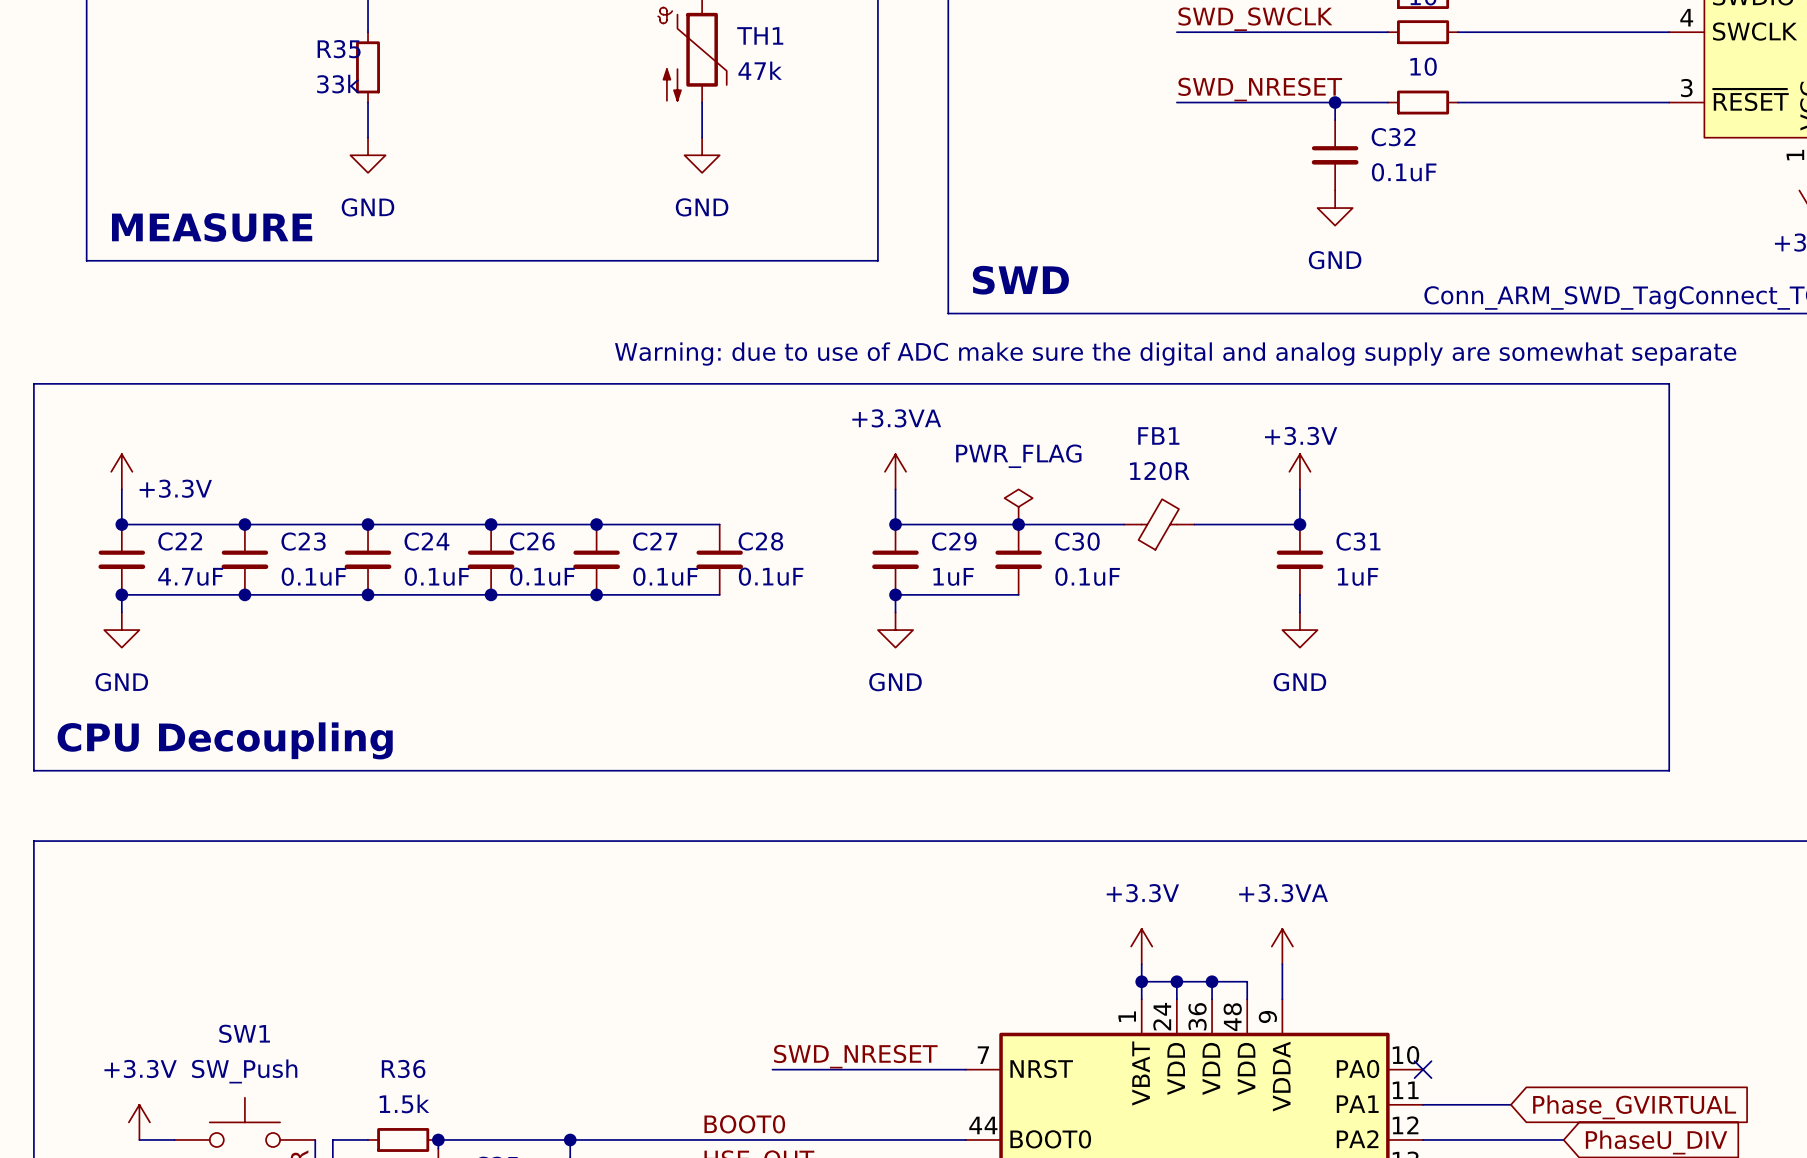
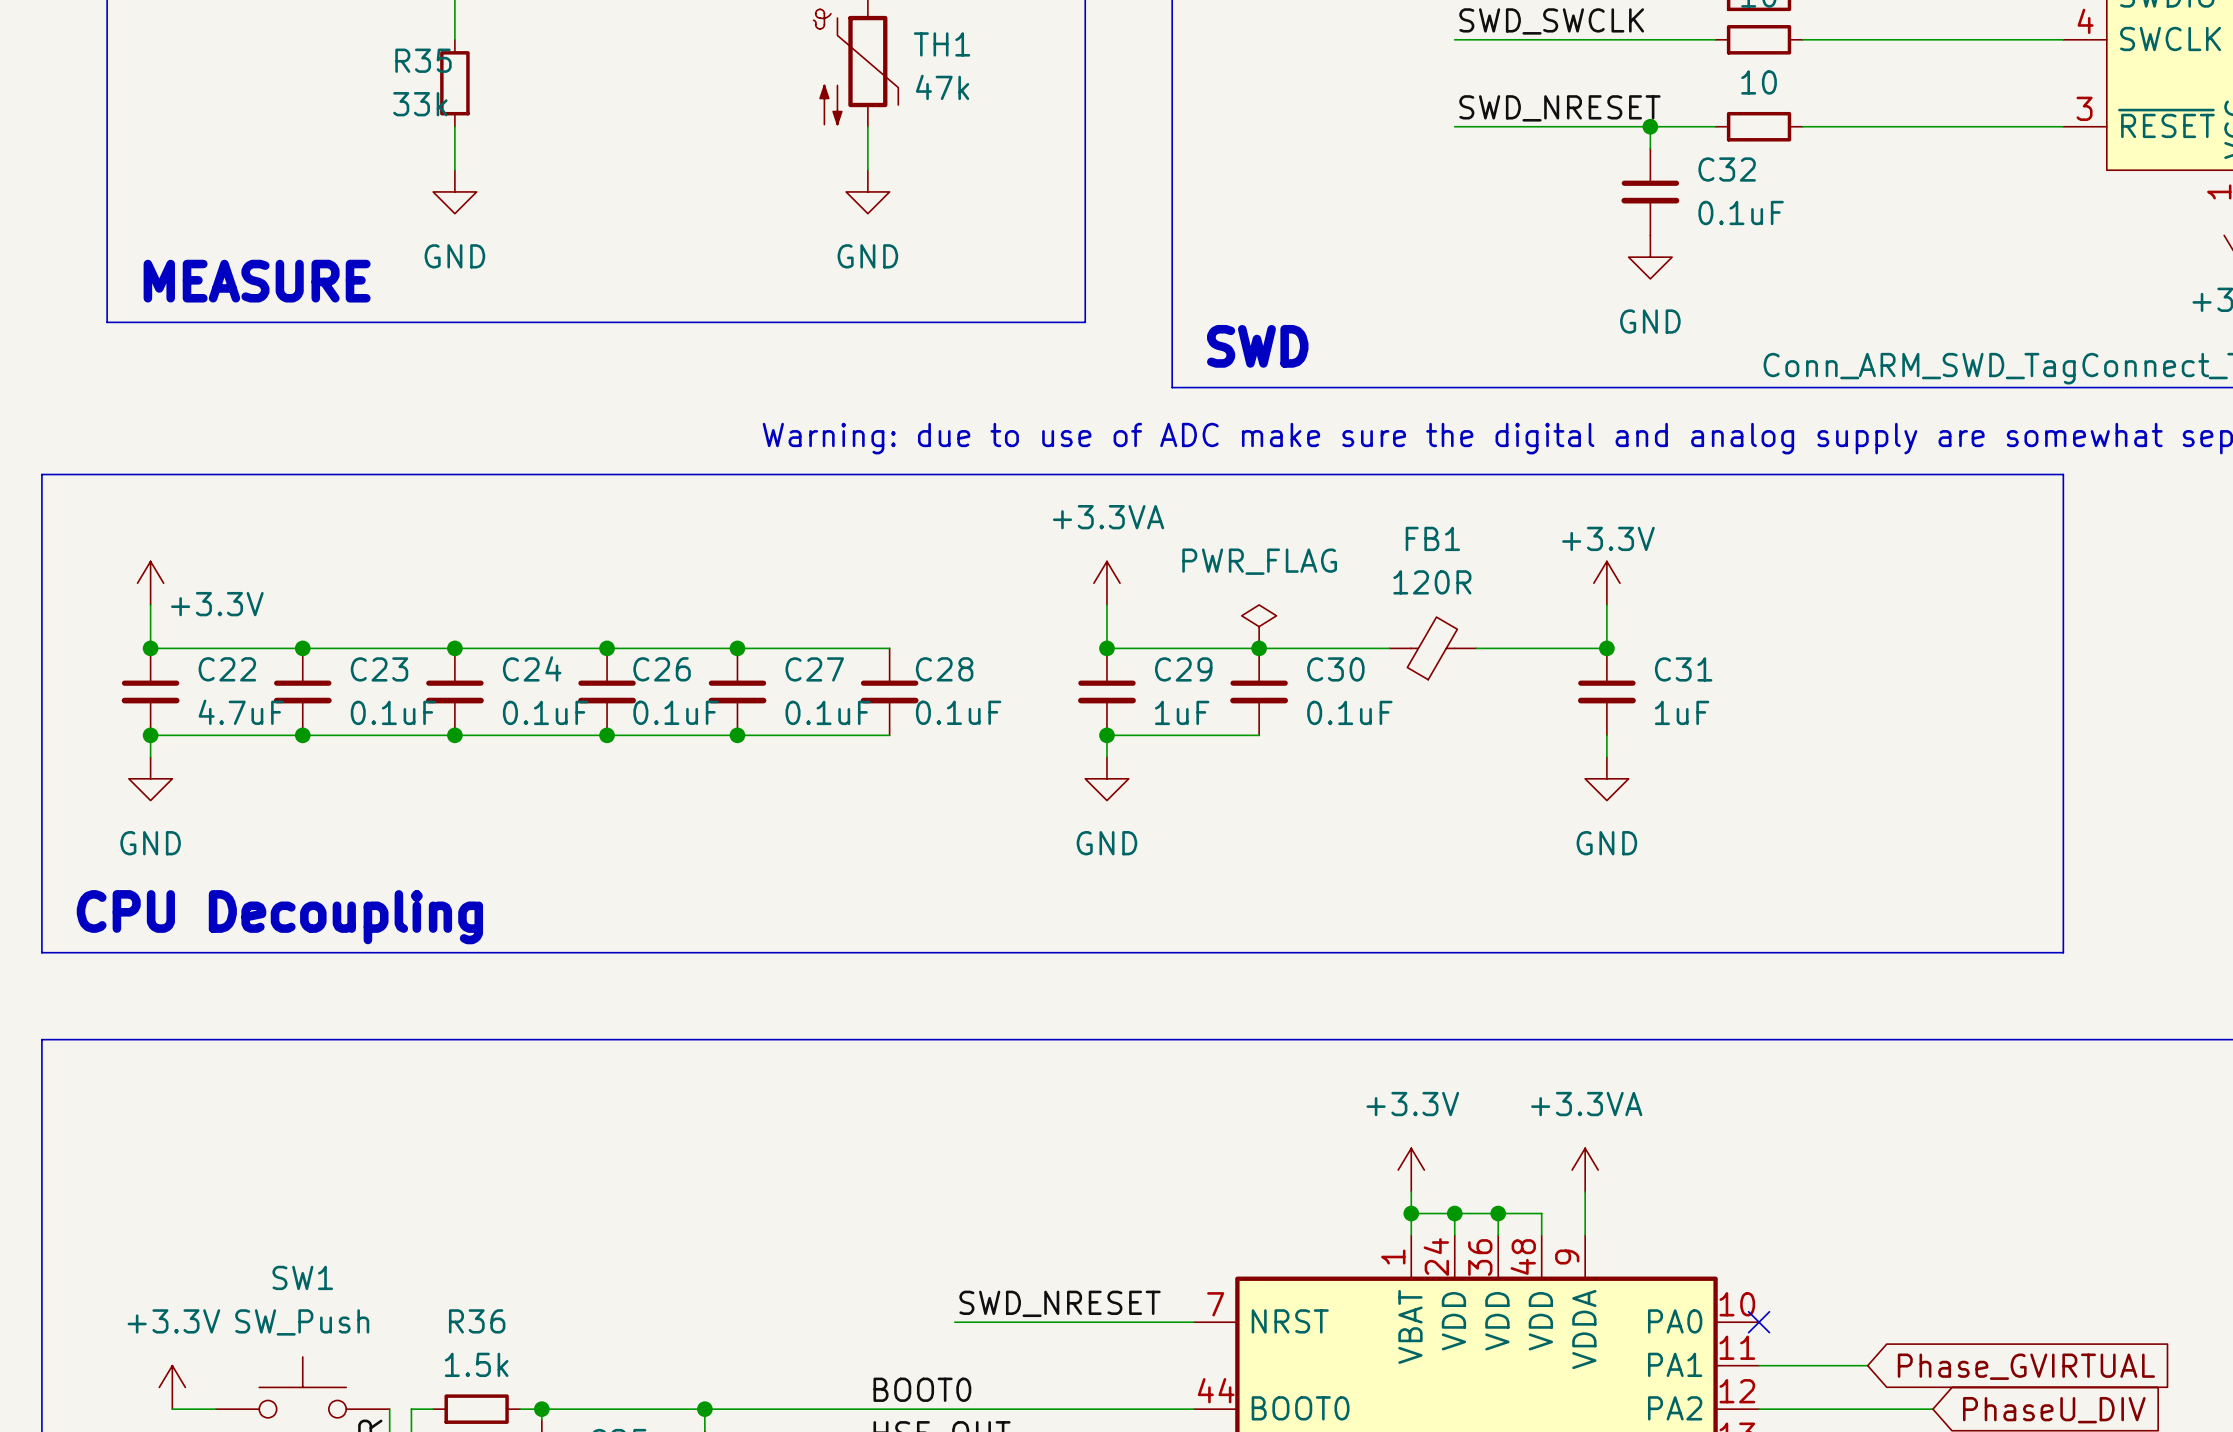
R36 position: (403, 1139) -> (476, 1409)

